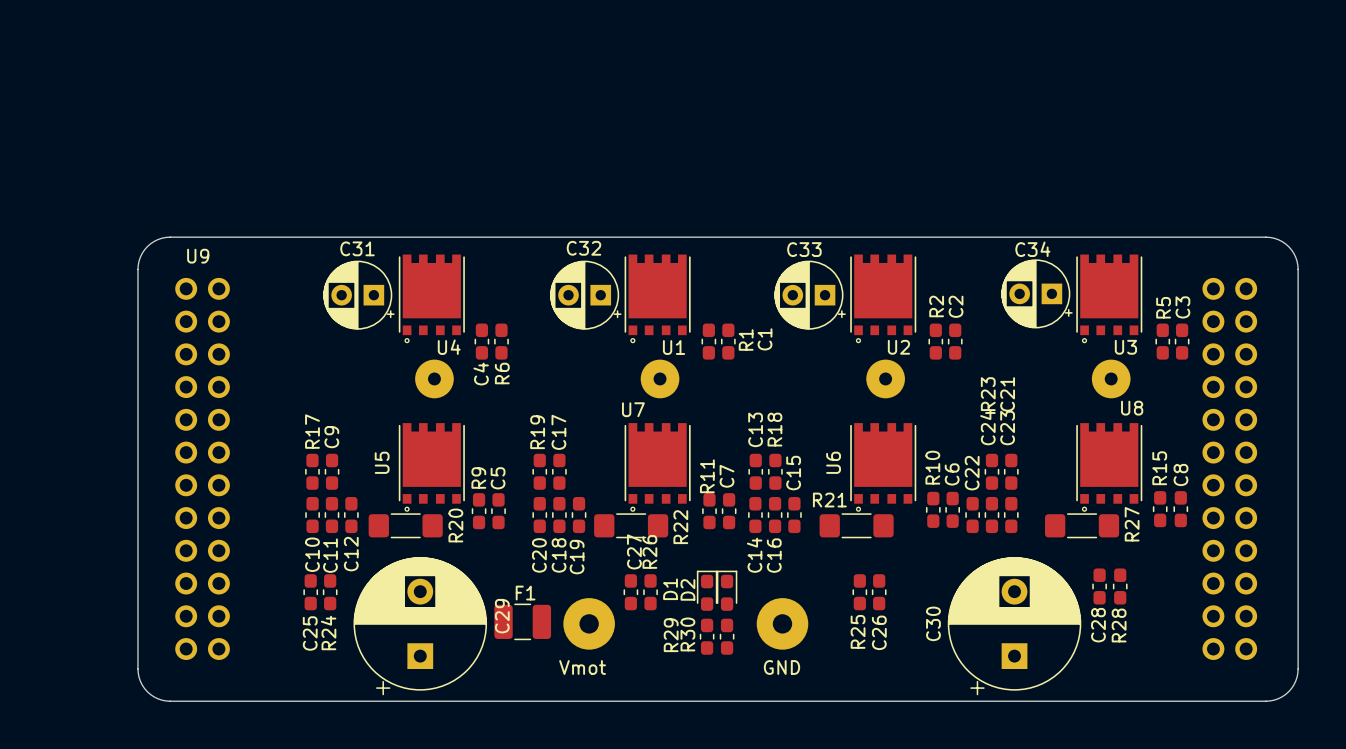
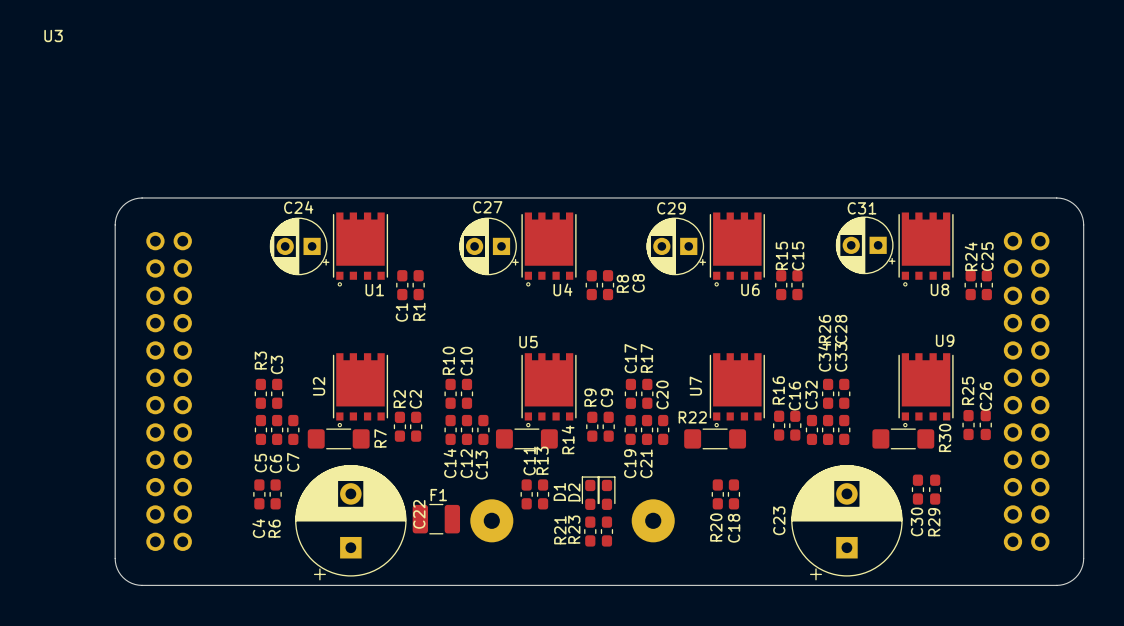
C31 name: C31 (357, 248) -> C24 (298, 207)
C32 name: C32 (583, 248) -> C27 (487, 207)
C33 name: C33 (804, 249) -> C29 (671, 208)
C34 name: C34 (1032, 249) -> C31 (862, 208)
R2 name: R2 (936, 306) -> R15 (781, 255)
C2 name: C2 (956, 306) -> C15 (798, 256)
R5 name: R5 (1163, 307) -> R24 (971, 256)
C3 name: C3 (1182, 307) -> C25 (987, 256)
R1 name: R1 (746, 339) -> R8 (622, 283)
C1 name: C1 (765, 339) -> C8 (638, 283)
U4 name: U4 (449, 347) -> U1 (374, 290)
U1 name: U1 (674, 347) -> U4 (562, 289)
U2 name: U2 (898, 347) -> U6 (750, 289)
U3 name: U3 (1125, 347) -> U8 (939, 289)
R6 name: R6 (502, 373) -> R1 (419, 311)
C4 name: C4 (481, 374) -> C1 (401, 312)
R23 name: R23 (988, 394) -> R26 (825, 329)
C21 name: C21 (1007, 394) -> C28 (841, 329)
U8 name: U8 (1132, 408) -> U9 (945, 340)
U7 name: U7 (633, 409) -> U5 (528, 342)
C24 name: C24 (987, 427) -> C34 (824, 357)
C23 name: C23 (1007, 428) -> C33 (841, 357)
C13 name: C13 (755, 429) -> C17 (630, 358)
R18 name: R18 (774, 429) -> R17 (646, 358)
R17 name: R17 (312, 431) -> R3 (260, 360)
R19 name: R19 (537, 432) -> R10 (448, 360)
C17 name: C17 (558, 432) -> C10 (466, 361)
C9 name: C9 (331, 437) -> C3 (277, 364)
U5 name: U5 (382, 462) -> U2 (319, 386)
U6 name: U6 (833, 462) -> U7 (695, 386)
R10 name: R10 (932, 467) -> R16 (778, 390)
U9: (716, 468) -> none
U3: none -> (597, 391)
R15 name: R15 (1159, 468) -> R25 (968, 390)
C15 name: C15 (793, 473) -> C20 (662, 394)
C22 name: C22 (972, 473) -> C32 (811, 394)
C6 name: C6 (952, 474) -> C16 (794, 396)
C8 name: C8 (1180, 475) -> C26 (985, 396)
R11 name: R11 (707, 476) -> R9 (590, 397)
C7 name: C7 (727, 476) -> C9 (606, 397)
R9 name: R9 (478, 477) -> R2 (399, 399)
C5 name: C5 (498, 478) -> C2 (415, 399)
R21 name: R21 (829, 500) -> R22 (692, 417)
R27 name: R27 (1132, 524) -> R30 (945, 437)
R20 name: R20 (455, 525) -> R7 (380, 438)
R22 name: R22 (680, 527) -> R14 (568, 439)
C27 name: C27 (634, 551) -> C11 (529, 460)
R26 name: R26 (649, 551) -> R13 (542, 460)
C10 name: C10 (312, 554) -> C5 (260, 463)
C12 name: C12 (351, 554) -> C7 (293, 462)
C11 name: C11 (330, 555) -> C6 (275, 463)
C20 name: C20 (539, 555) -> C14 (450, 463)
C18 name: C18 (559, 555) -> C12 (466, 463)
C14 name: C14 (754, 555) -> C19 (630, 463)
C16 name: C16 (774, 555) -> C21 (646, 463)
C19 name: C19 (577, 557) -> C13 (481, 465)
C29 name: C29 (502, 616) -> C22 (419, 514)
C30 name: C30 (933, 623) -> C23 (779, 520)
C28 name: C28 (1098, 625) -> C30 (917, 521)
R28 name: R28 (1119, 625) -> R29 (934, 522)
R25 name: R25 (858, 631) -> R20 (716, 527)
C26 name: C26 (879, 632) -> C18 (734, 528)
C25 name: C25 (310, 633) -> C4 (258, 528)
R24 name: R24 (328, 633) -> R6 (274, 528)
R30 name: R30 (687, 634) -> R23 (574, 529)
R29 name: R29 (671, 635) -> R21 (560, 530)
text: Vmot (582, 667) -> none
text: GND (781, 667) -> none

